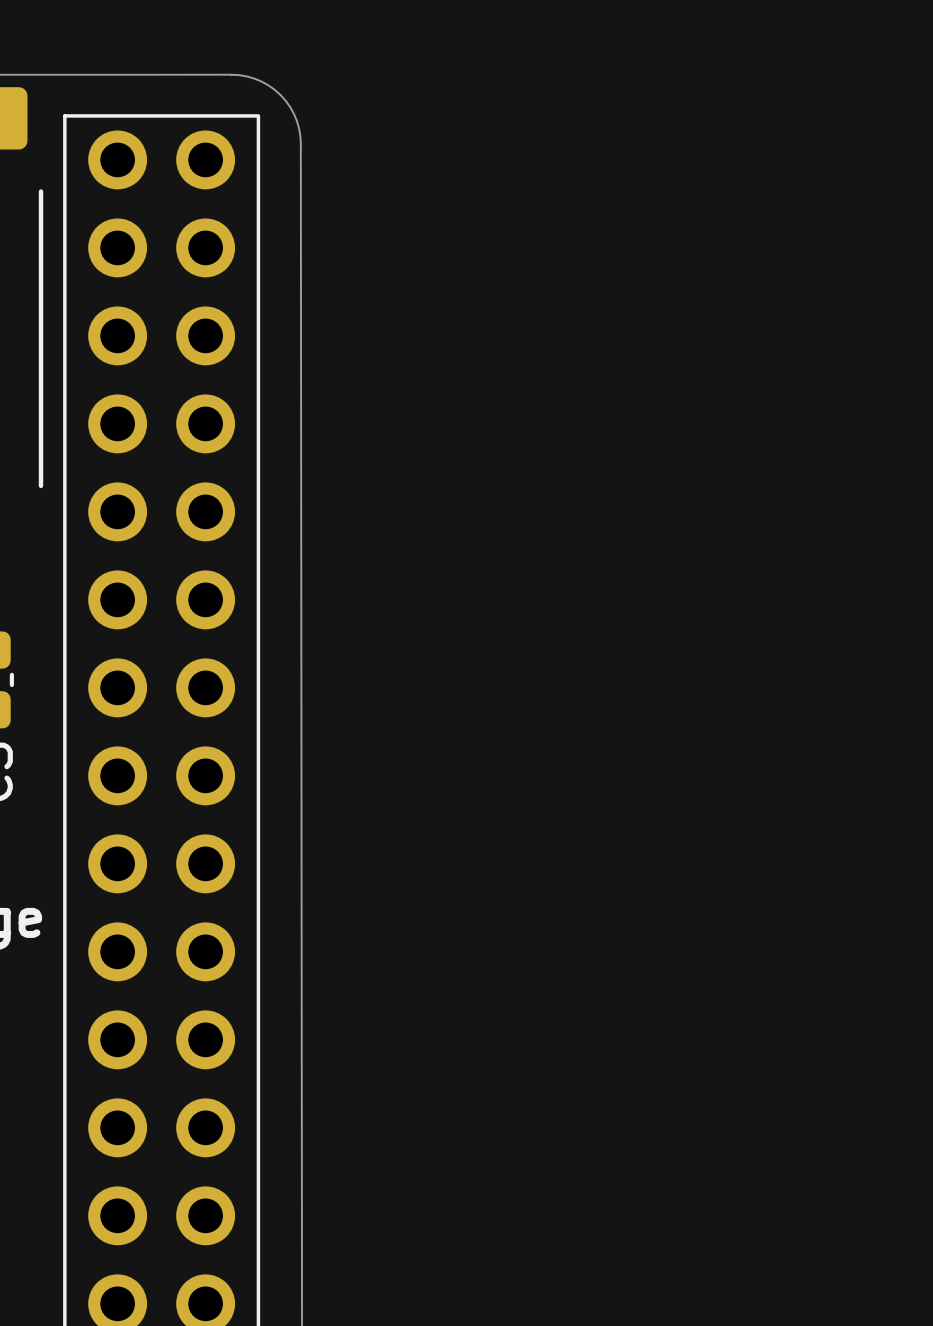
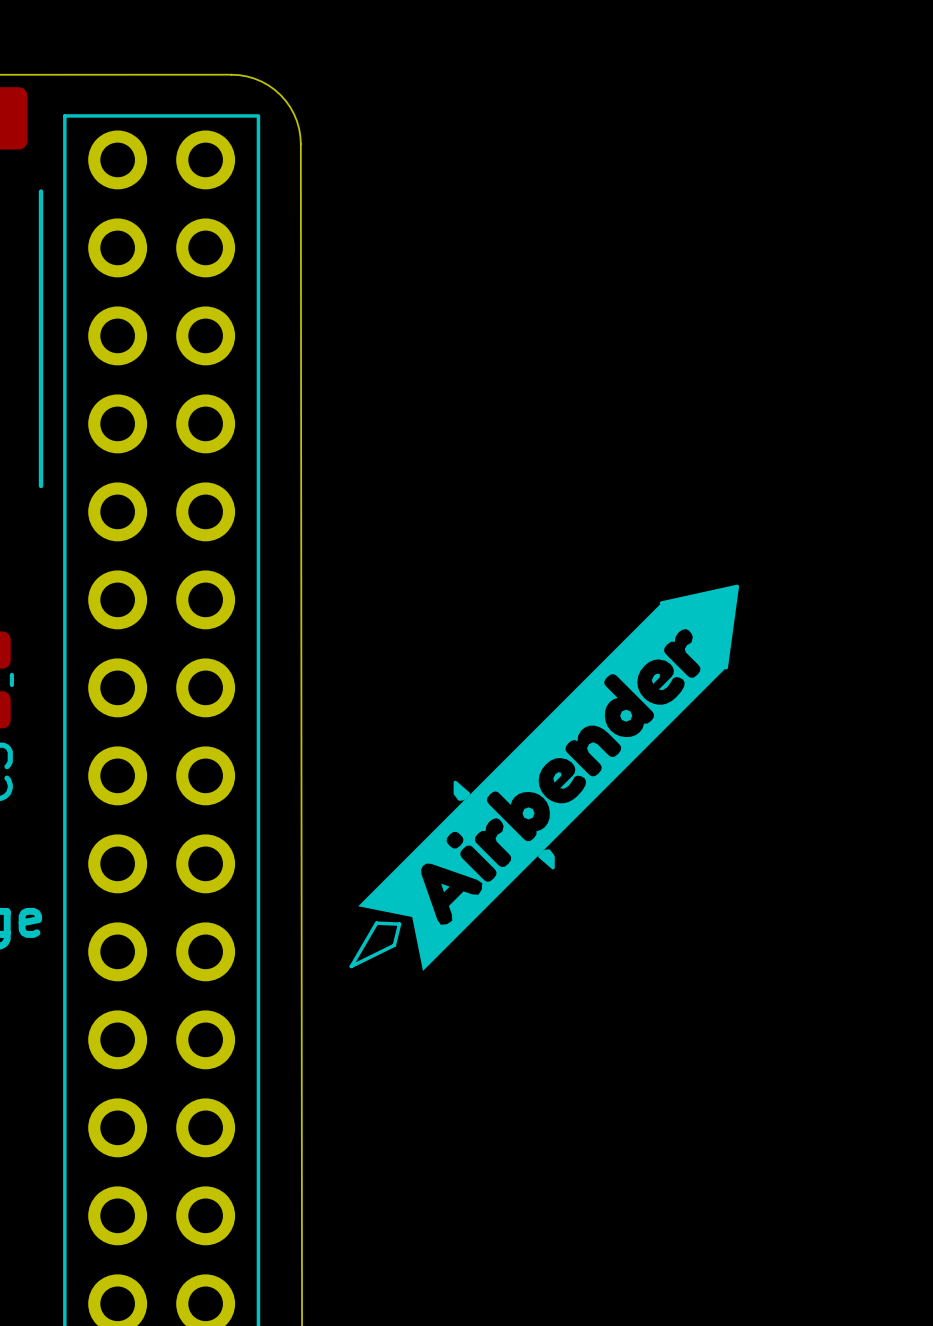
drawing: none -> [358, 584, 740, 971]
line: none -> (376, 923) (399, 924) (394, 945) (351, 966) (376, 923)

